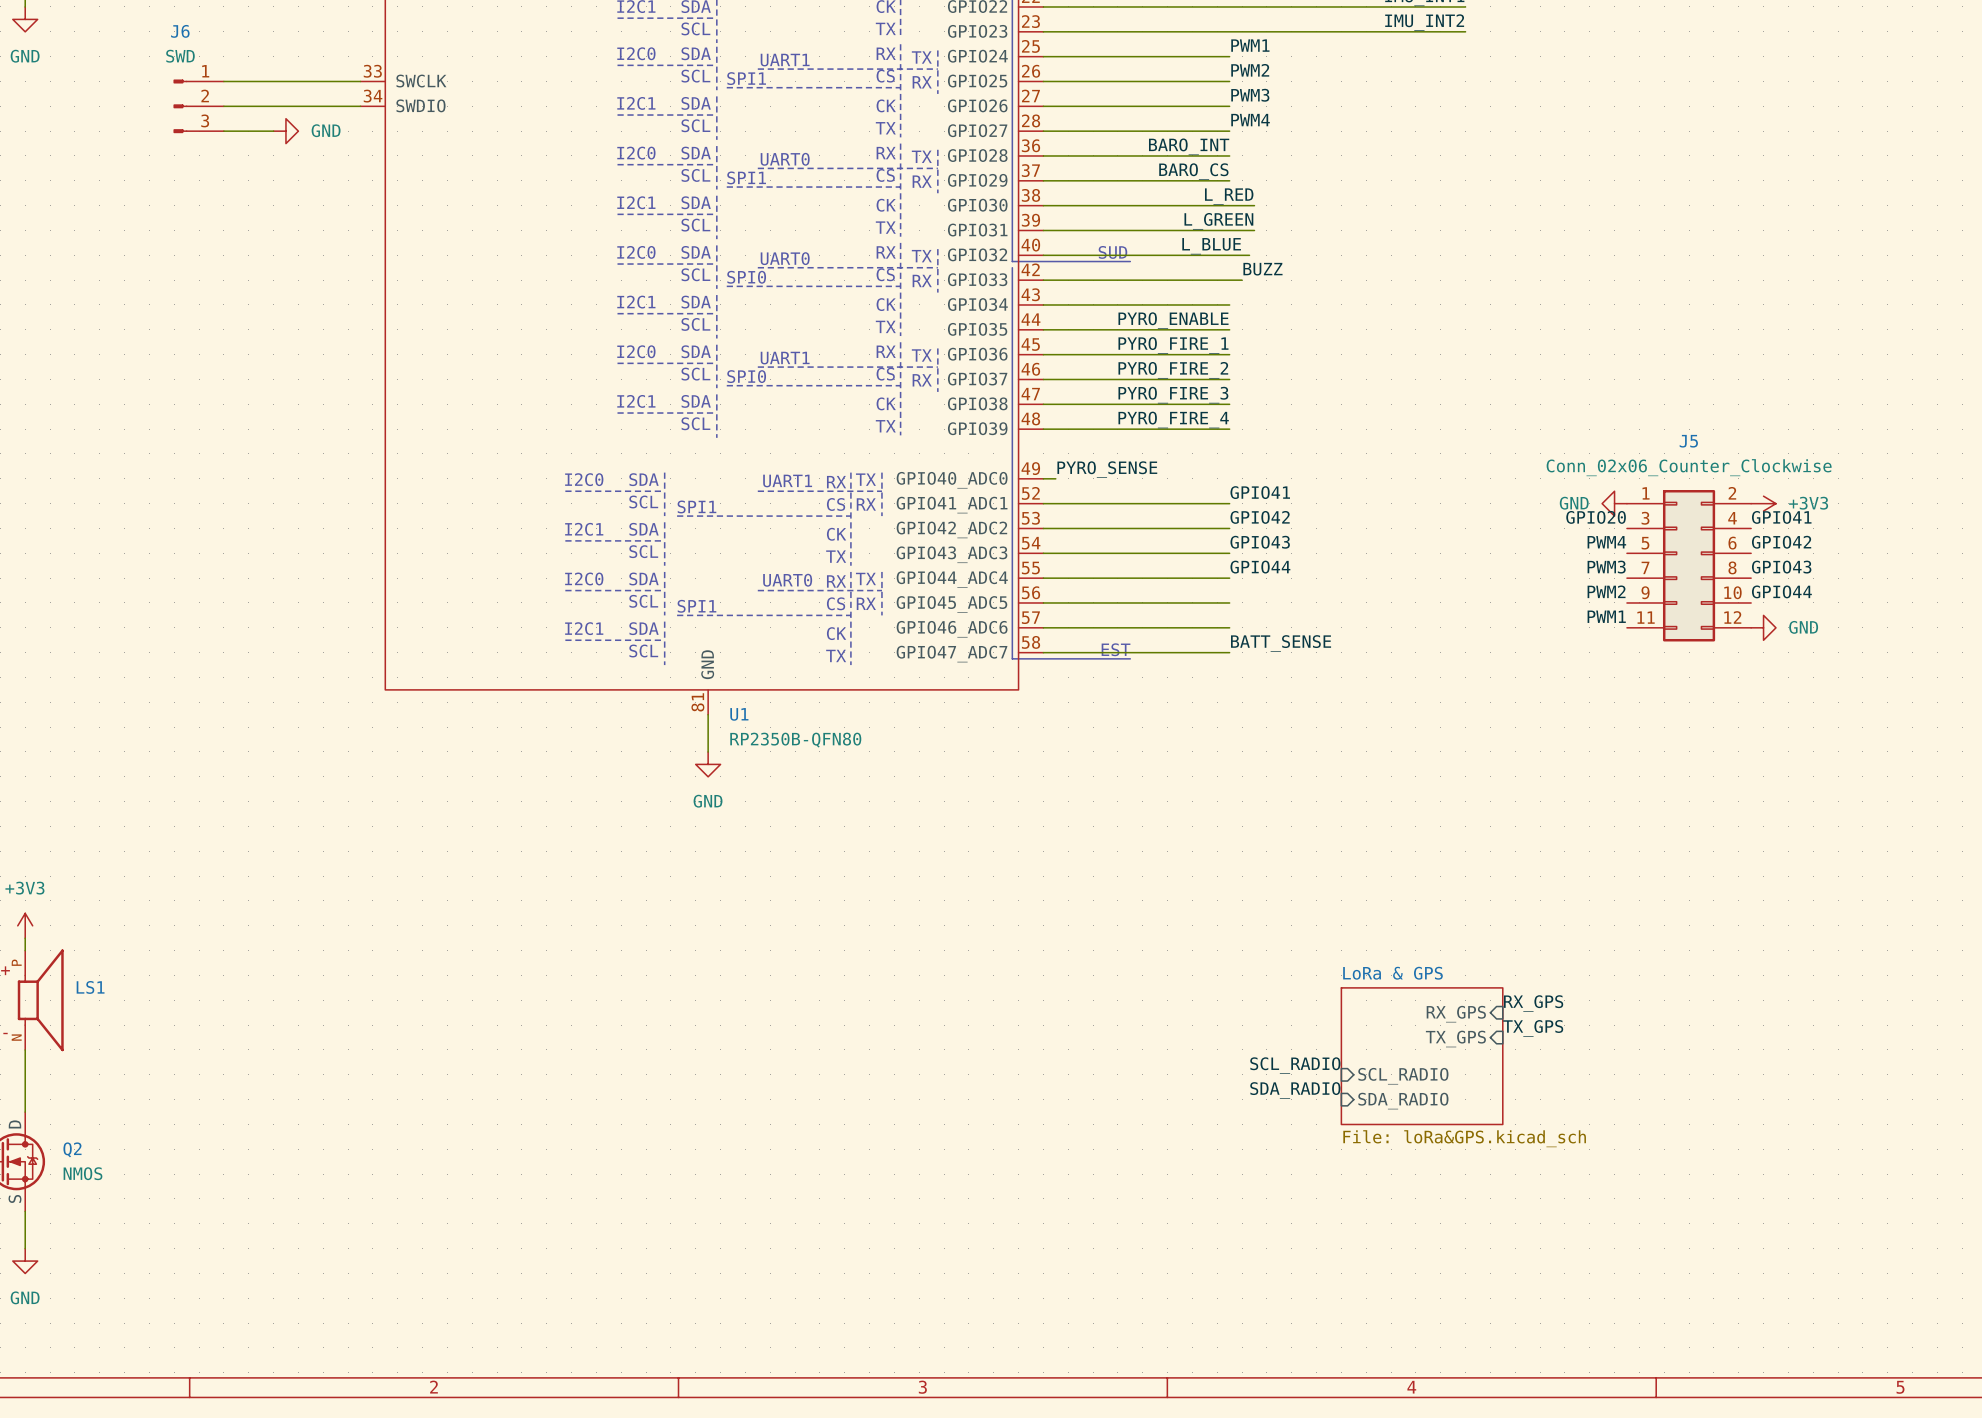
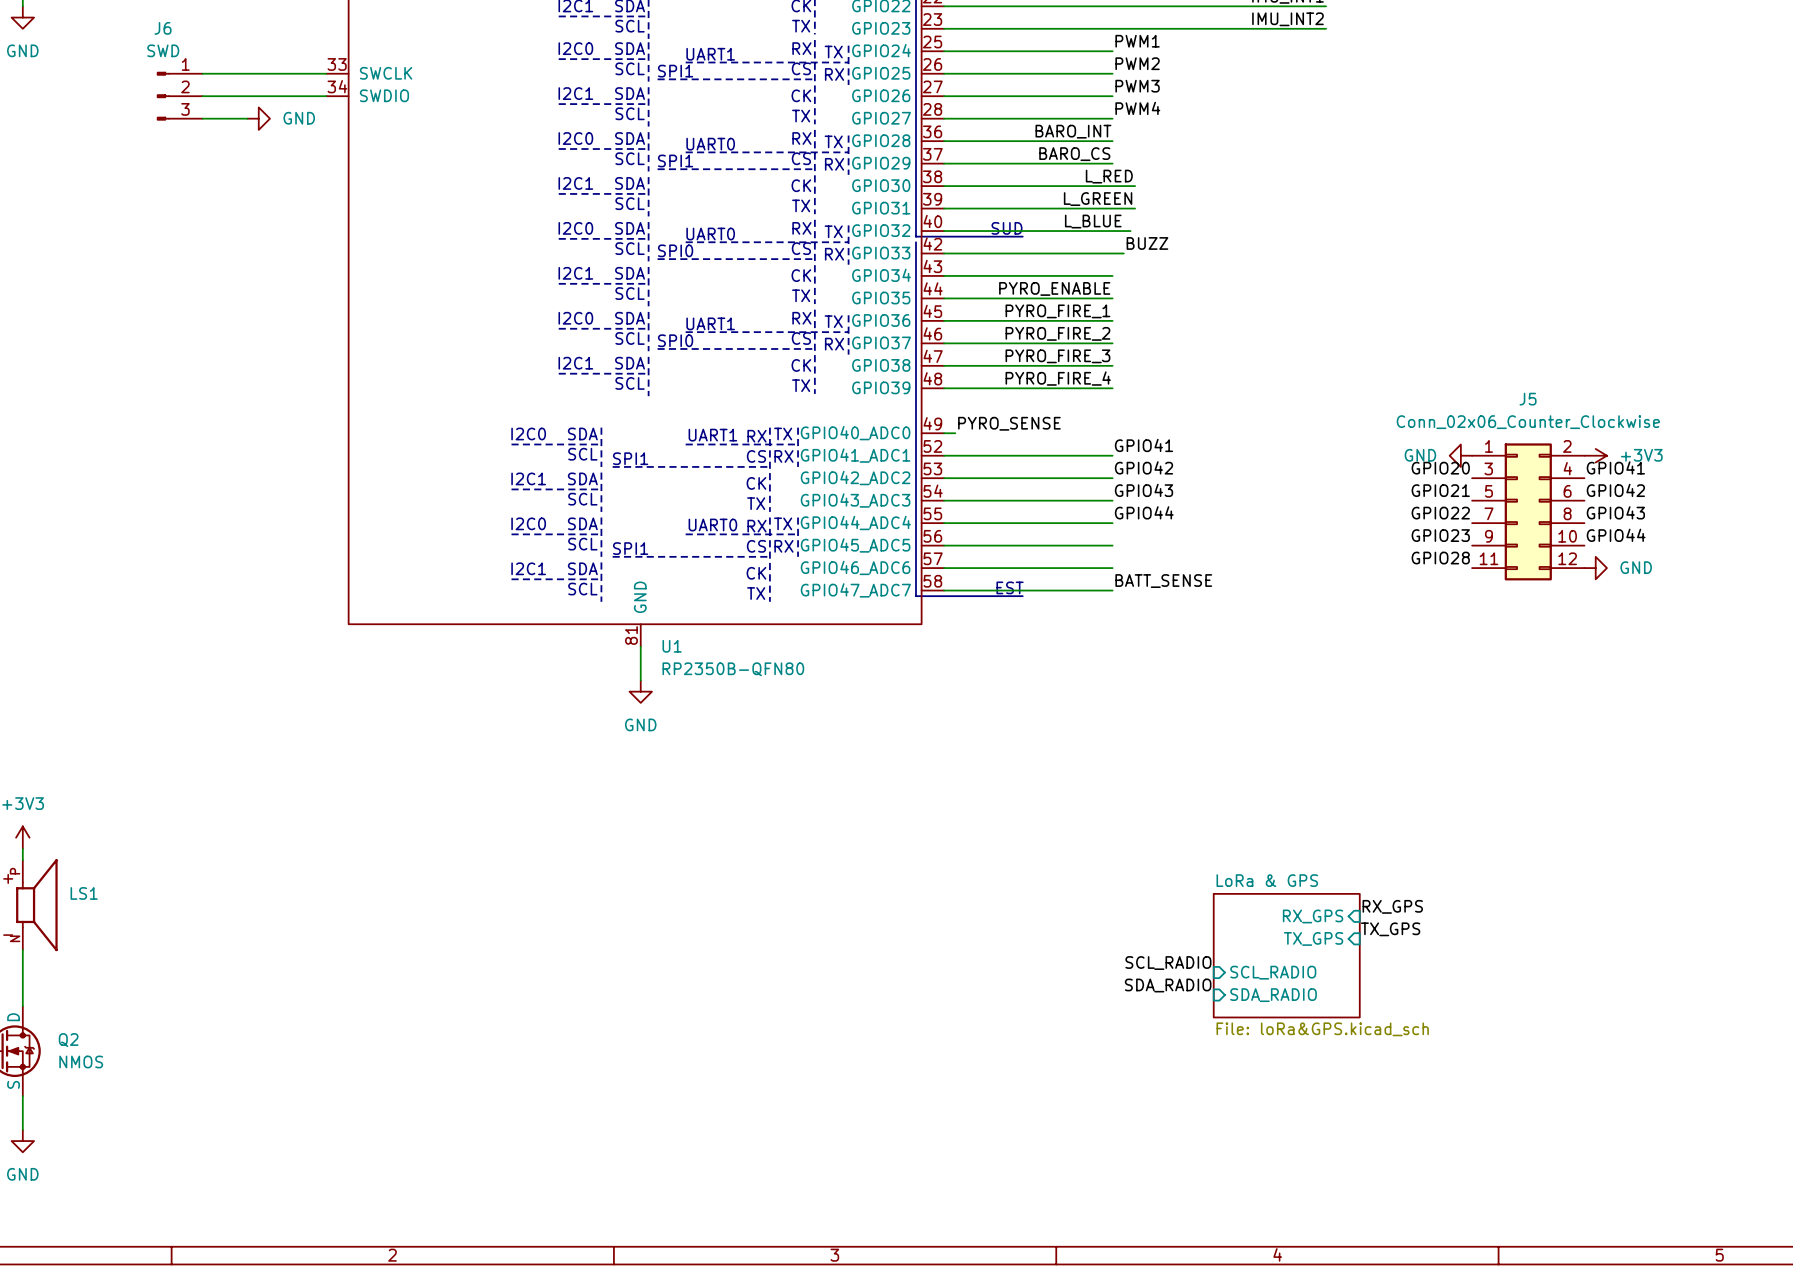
label: PWM4 (1606, 542) -> GPIO21 (1440, 490)
label: PWM3 (1606, 567) -> GPIO22 (1440, 513)
label: PWM2 (1606, 591) -> GPIO23 (1440, 535)
label: PWM1 (1606, 616) -> GPIO28 (1440, 558)

